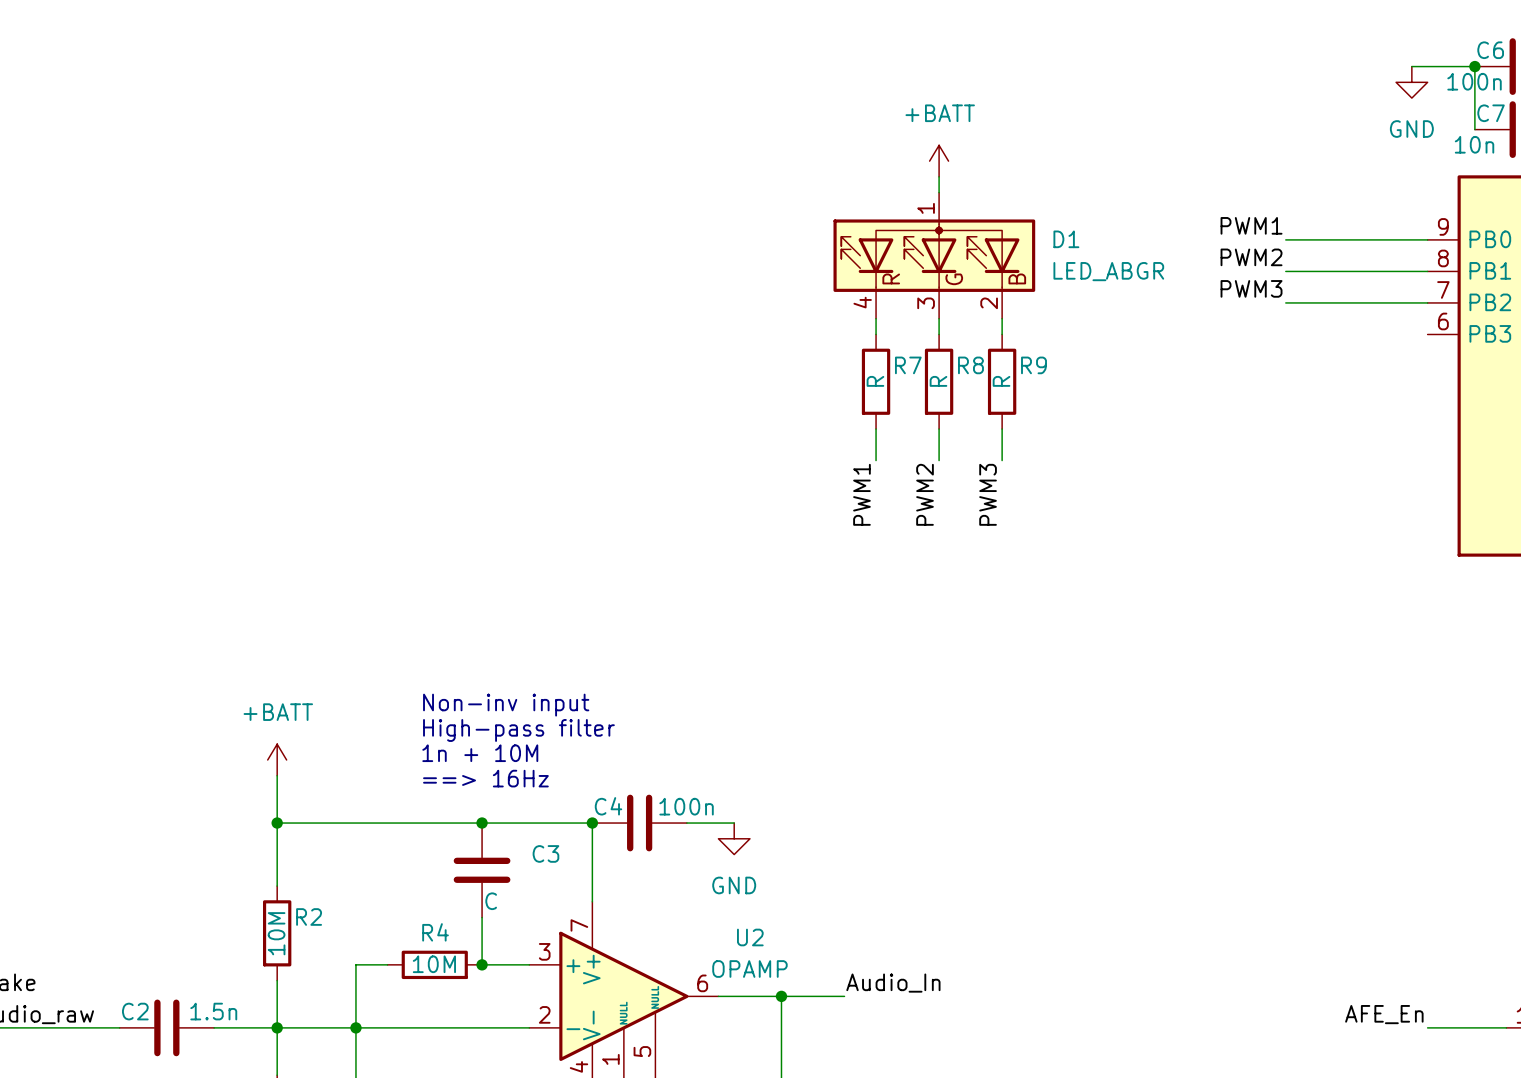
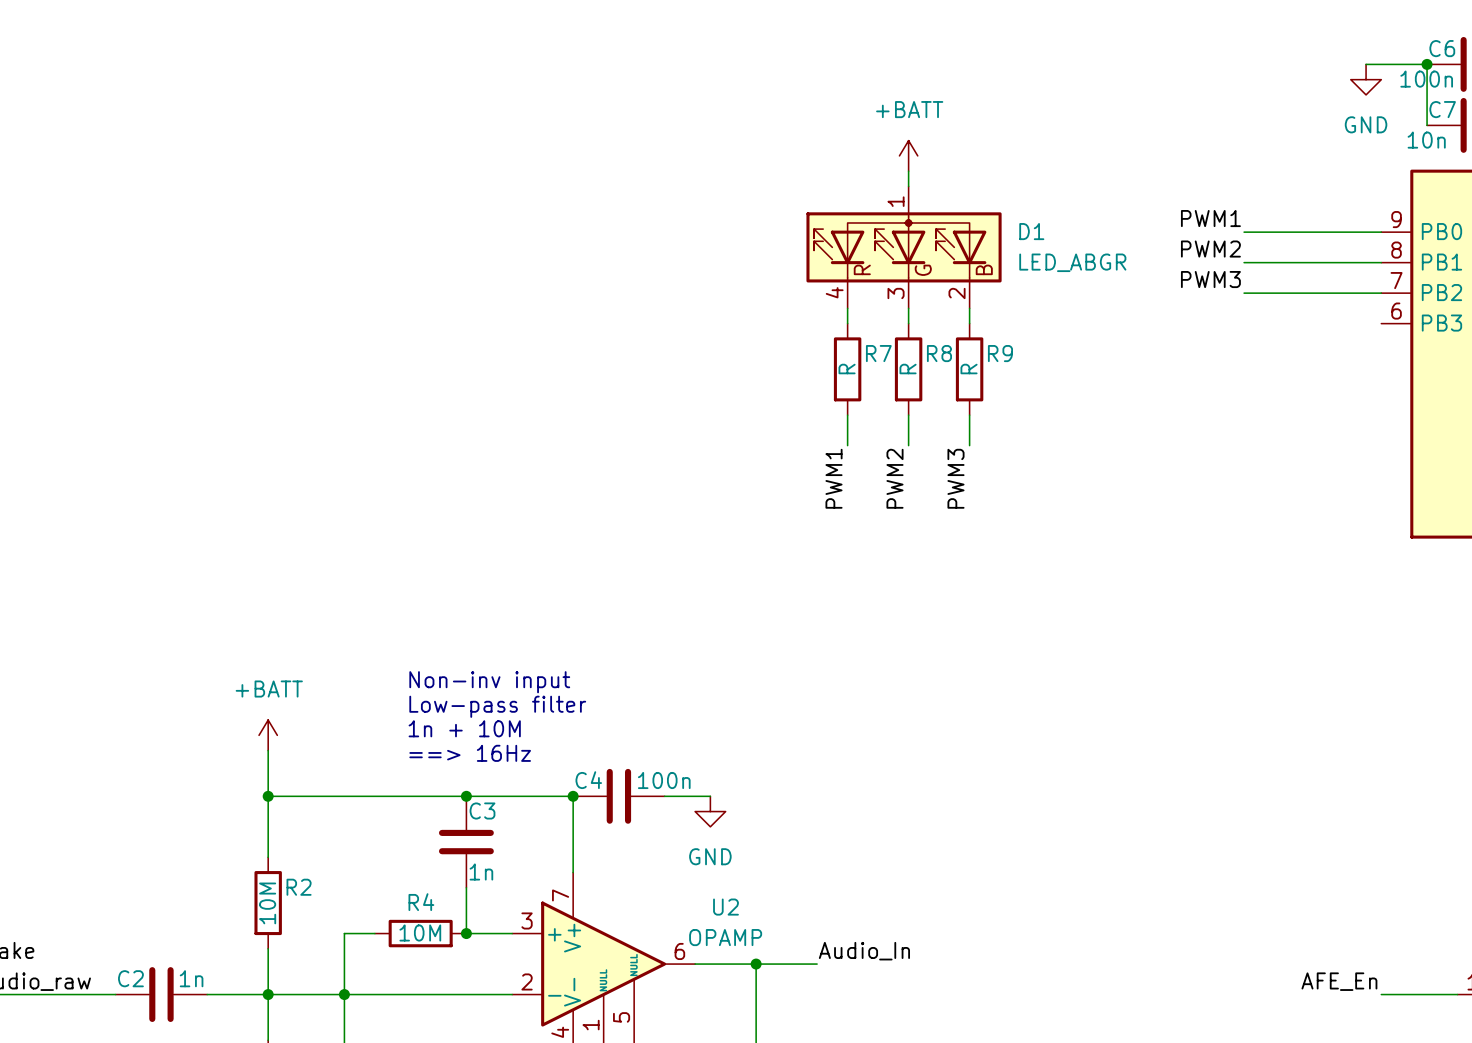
text: High-pass filter (518, 730) -> Low-pass filter (497, 706)
C3 name position: C3 (545, 853) -> C3 (482, 811)
C3 value: C (491, 901) -> 1n (481, 871)
C2 value: 1.5n (213, 1011) -> 1n (191, 978)

